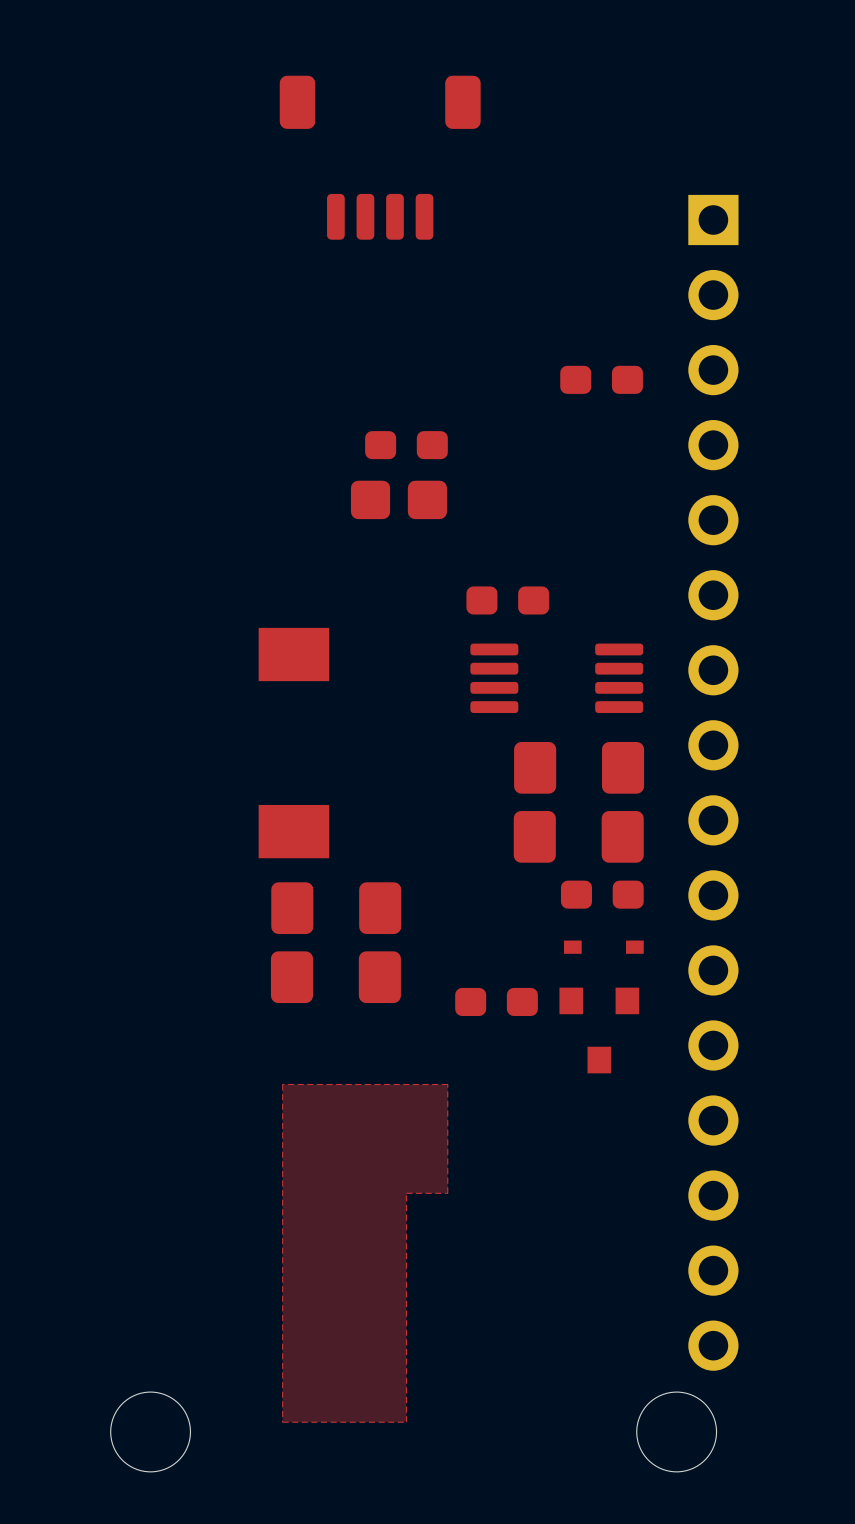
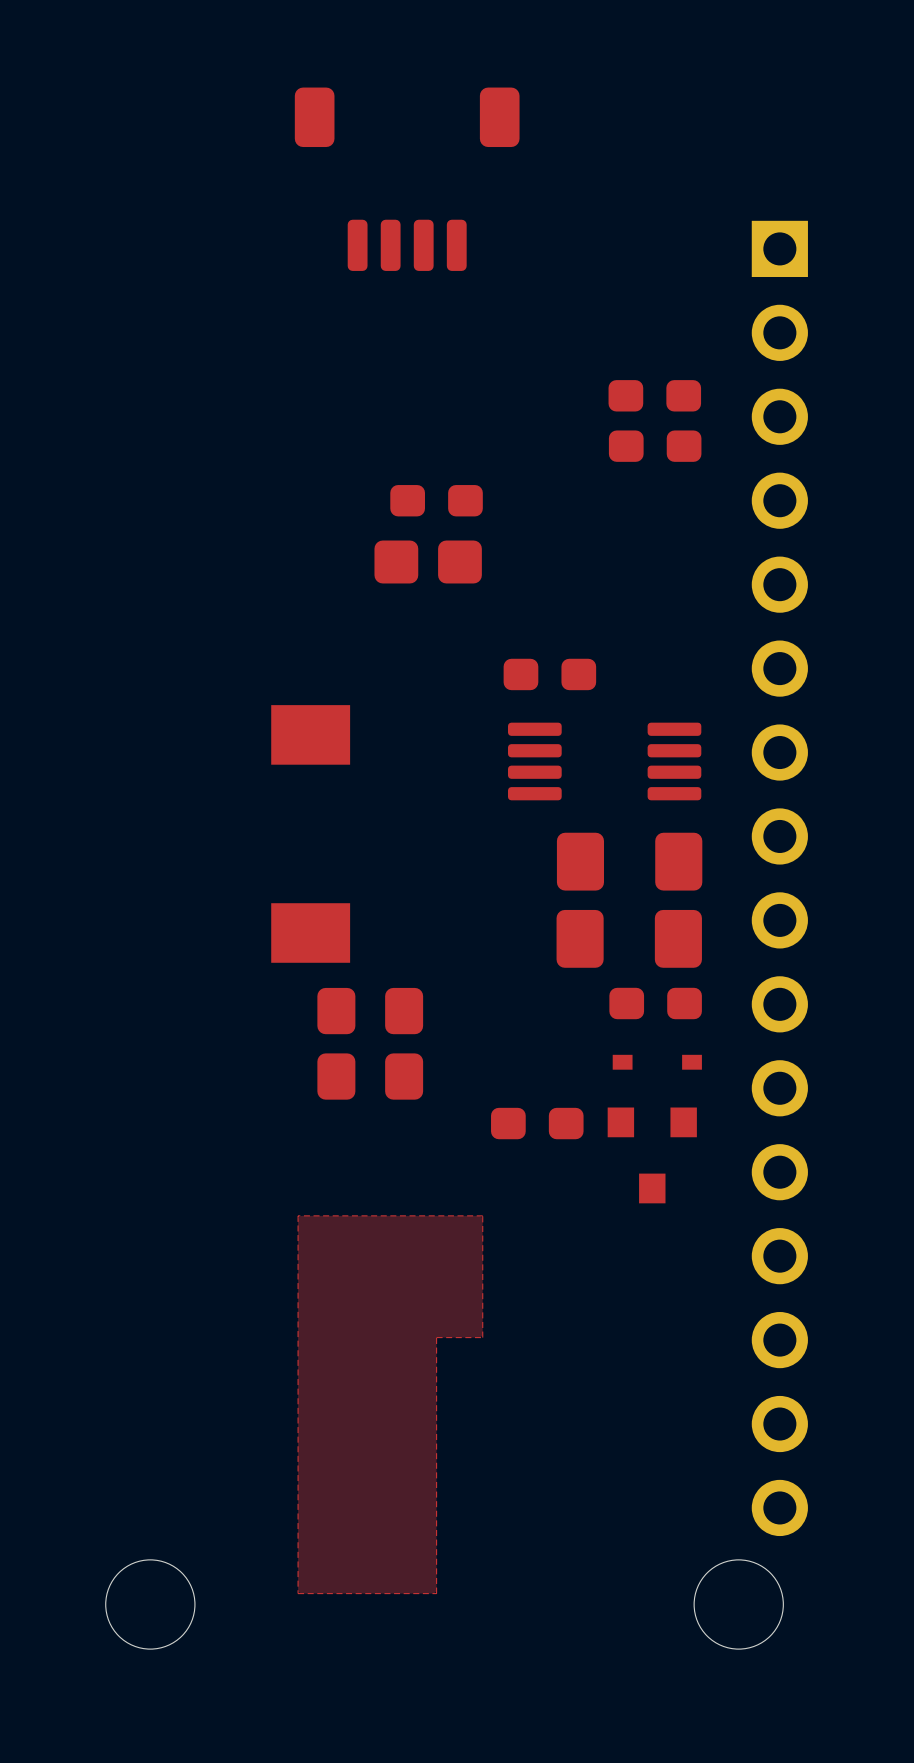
part: none -> (654, 395)
part: (601, 379) -> none
part: none -> (655, 446)
part footprint: [271, 882, 402, 935] -> [317, 987, 424, 1035]
part footprint: [270, 951, 401, 1004] -> [317, 1053, 424, 1100]

